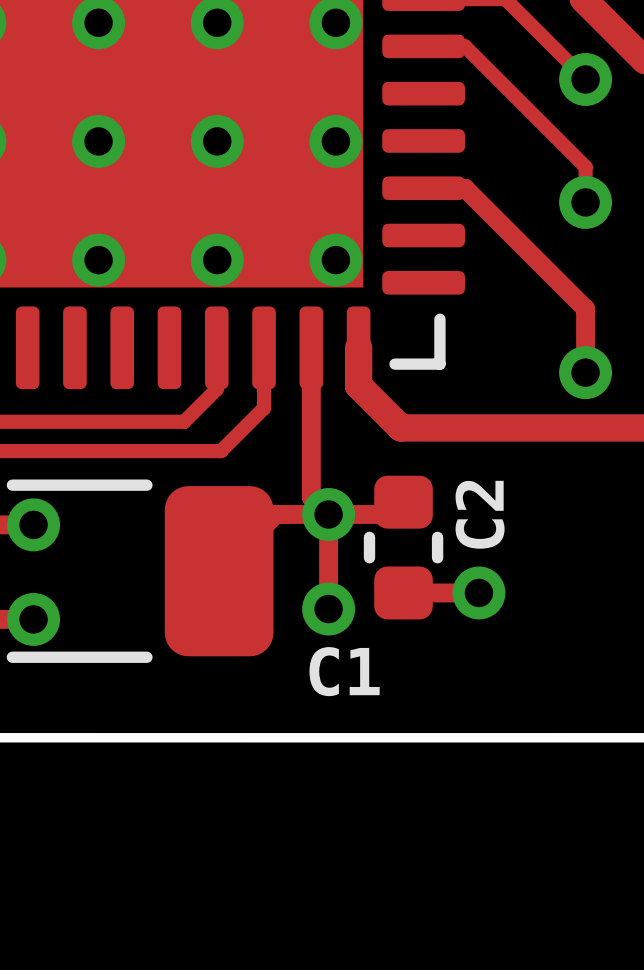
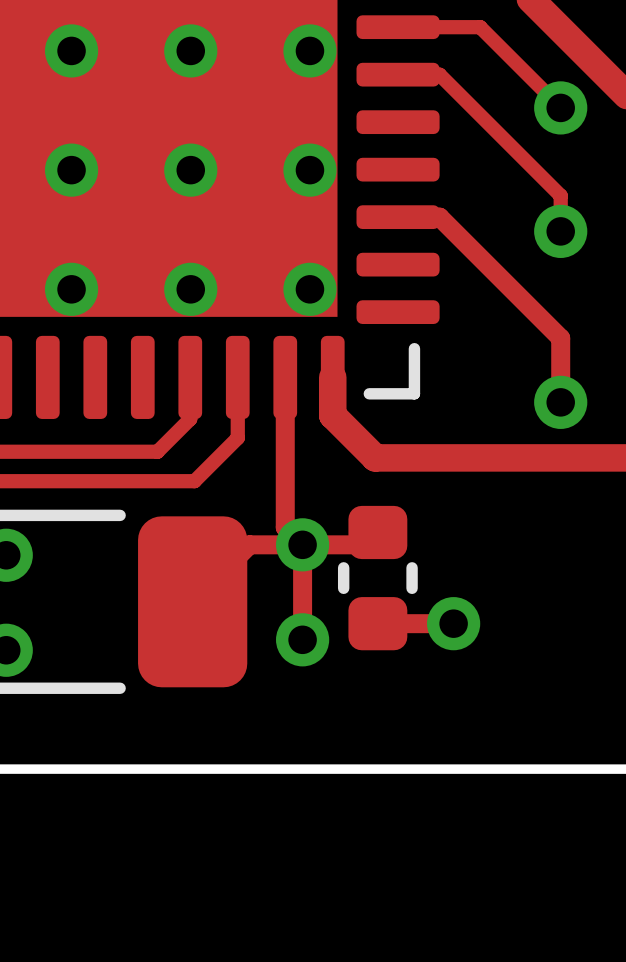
C2 name: C2 (480, 514) -> none
C1 name: C1 (344, 671) -> none

